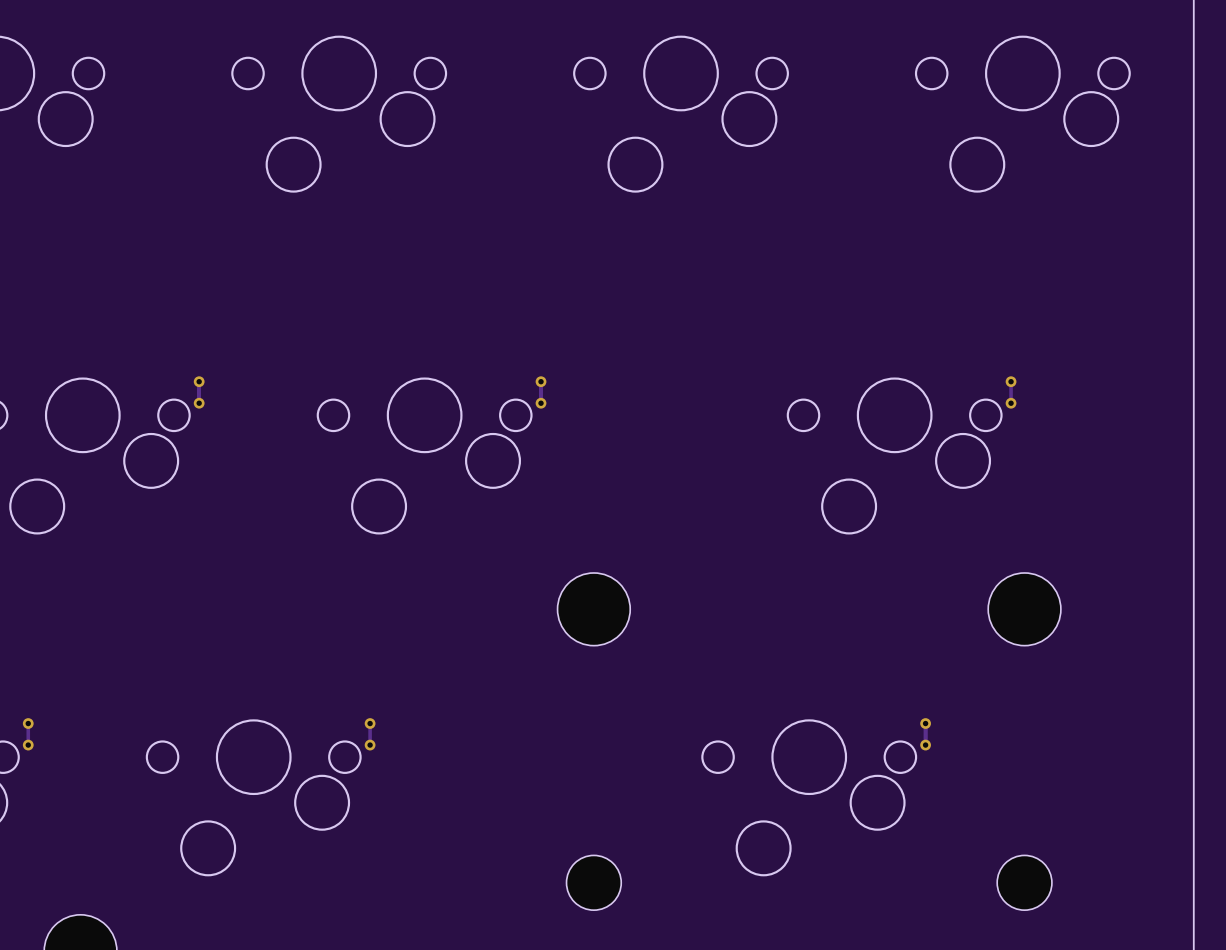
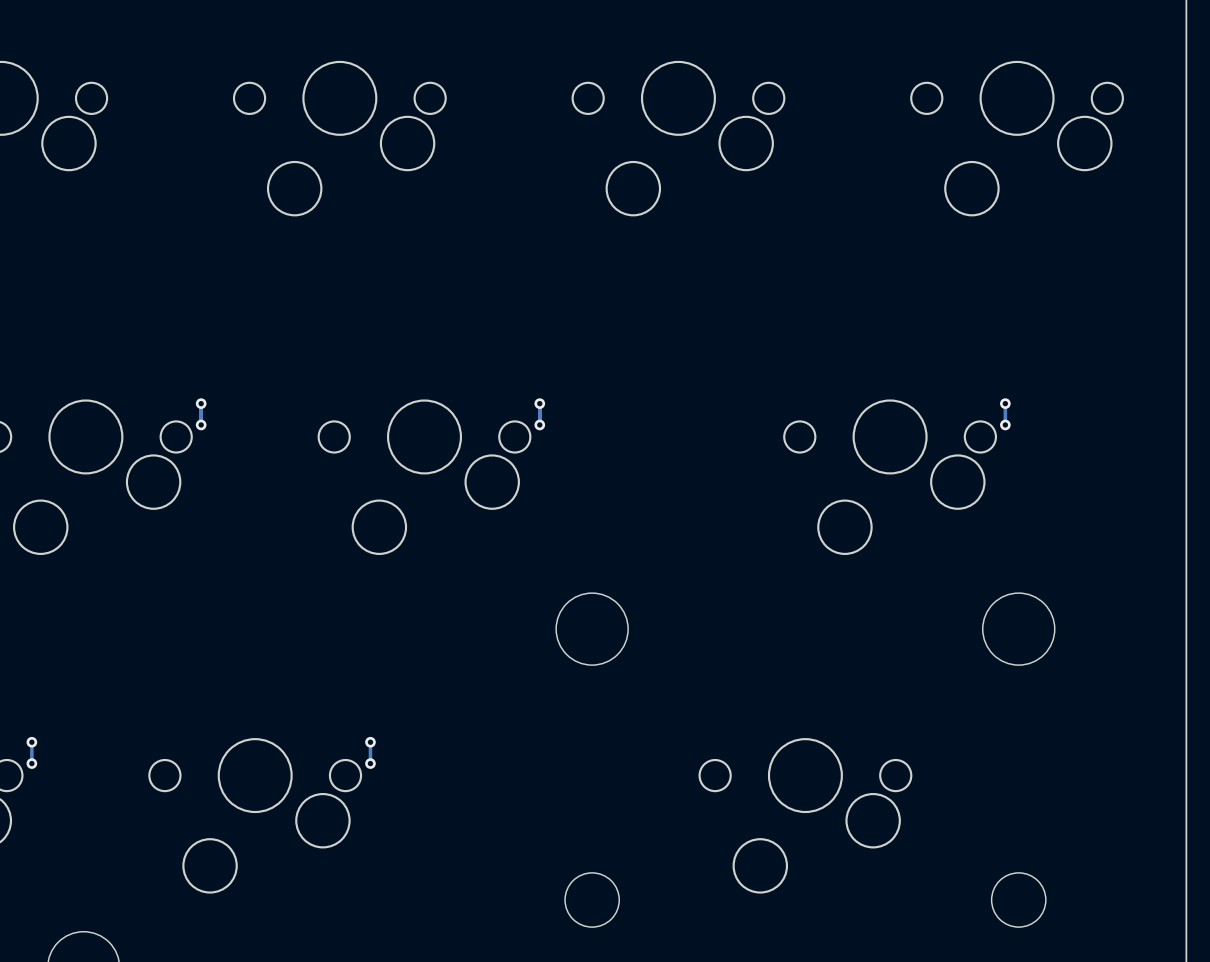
track: (925, 723) (925, 745) -> none
via: (925, 723) -> none
via: (925, 745) -> none

